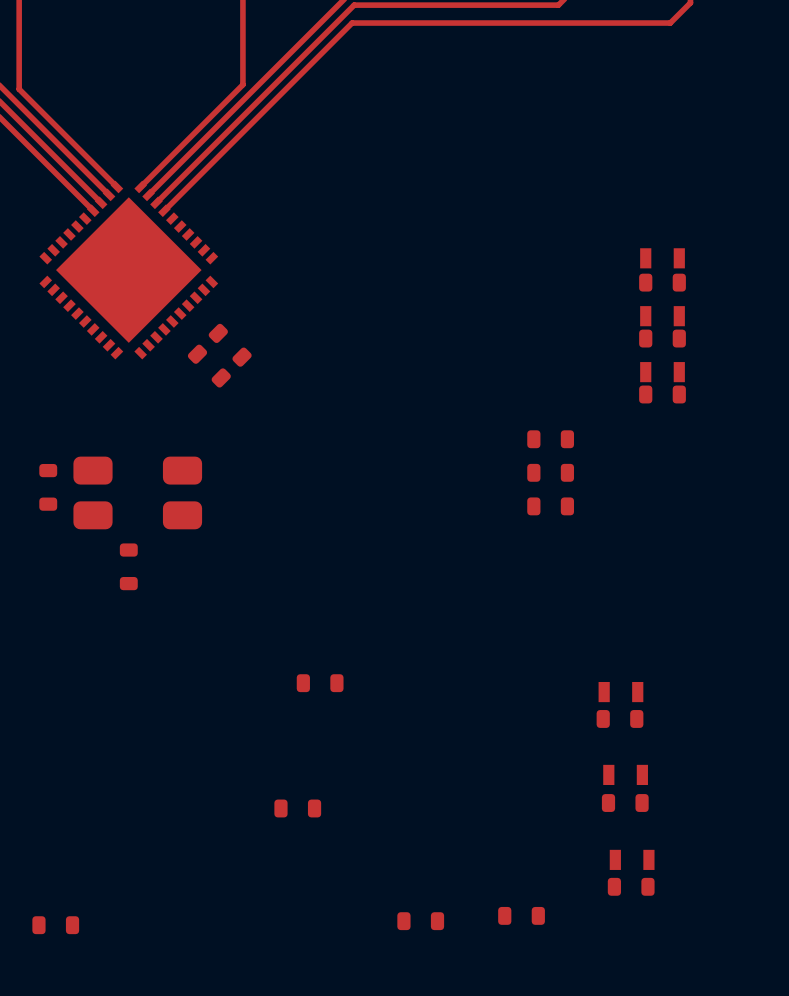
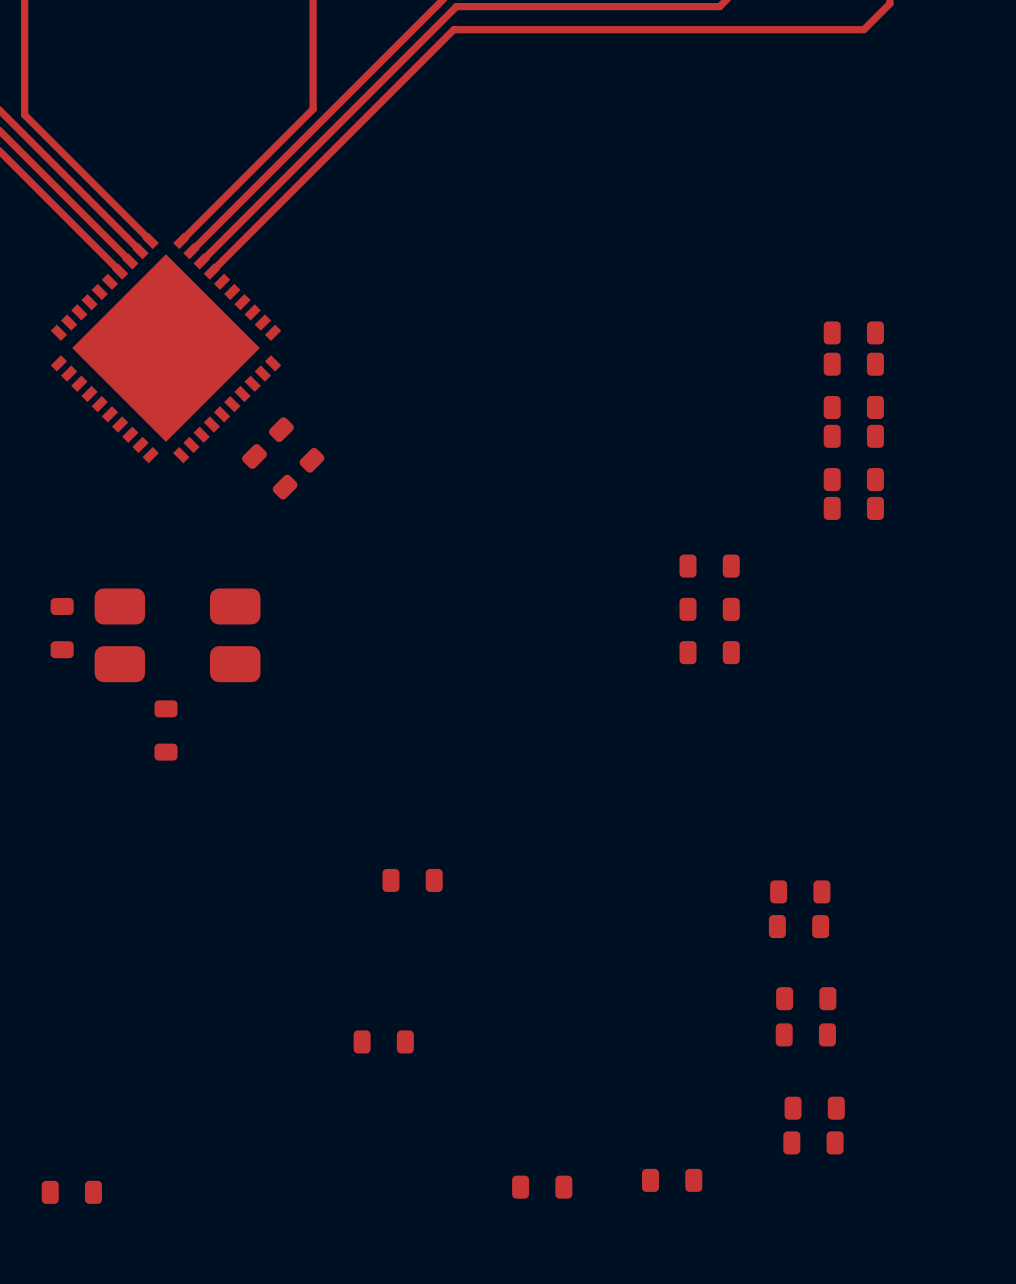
part footprint: [640, 248, 685, 269] -> [823, 321, 884, 345]
part footprint: [640, 306, 685, 327] -> [823, 395, 884, 420]
part footprint: [640, 362, 685, 383] -> [823, 468, 884, 492]
part footprint: [598, 682, 644, 703] -> [770, 880, 831, 904]
part footprint: [603, 764, 648, 785] -> [776, 987, 837, 1011]
part footprint: [609, 849, 655, 870] -> [784, 1096, 845, 1120]

